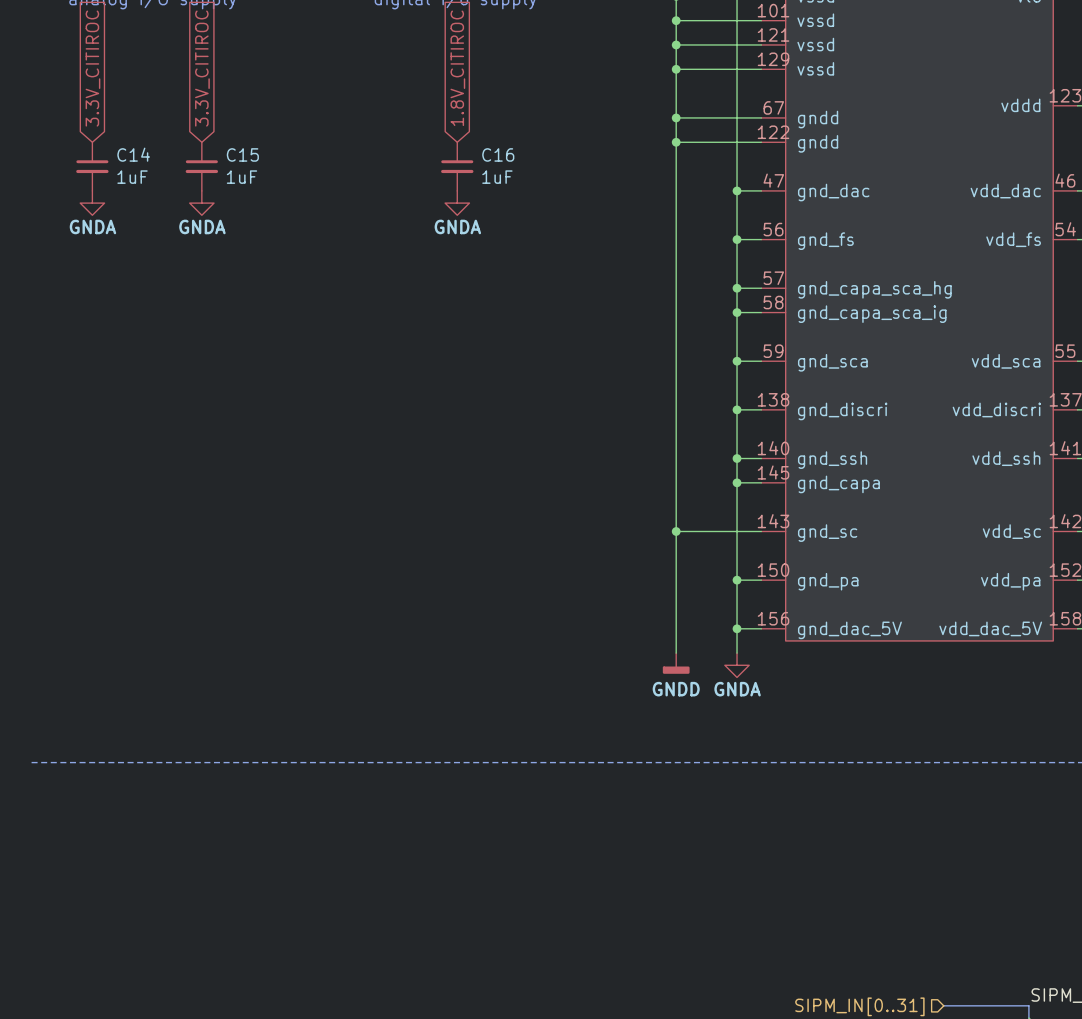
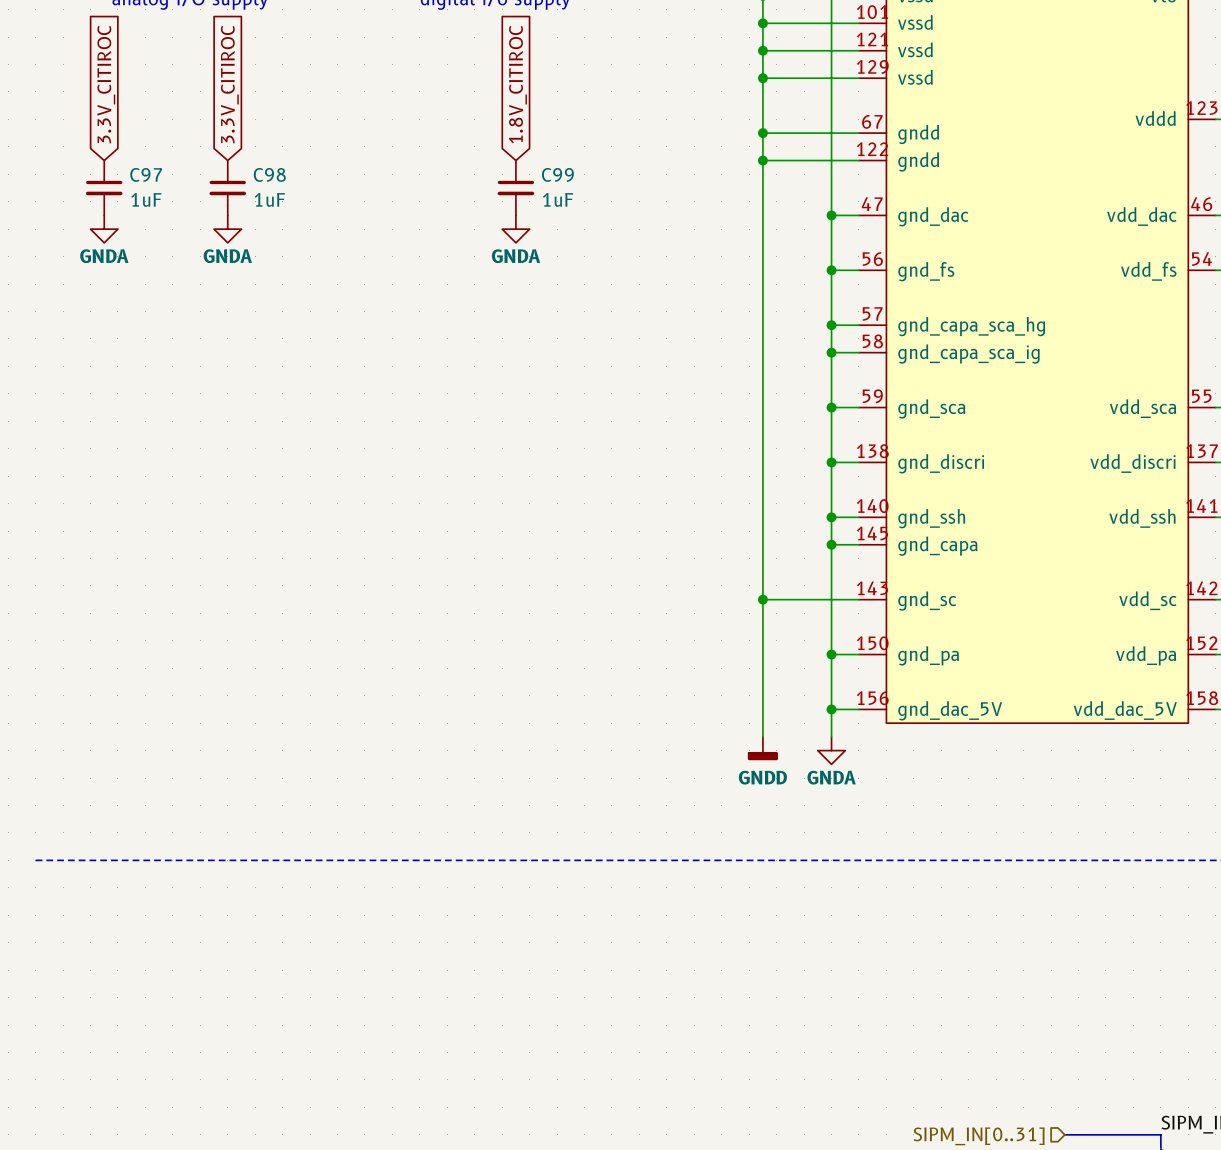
C14 name: C14 (133, 154) -> C97 (146, 174)
C15 name: C15 (242, 154) -> C98 (269, 174)
C16 name: C16 (498, 154) -> C99 (557, 174)

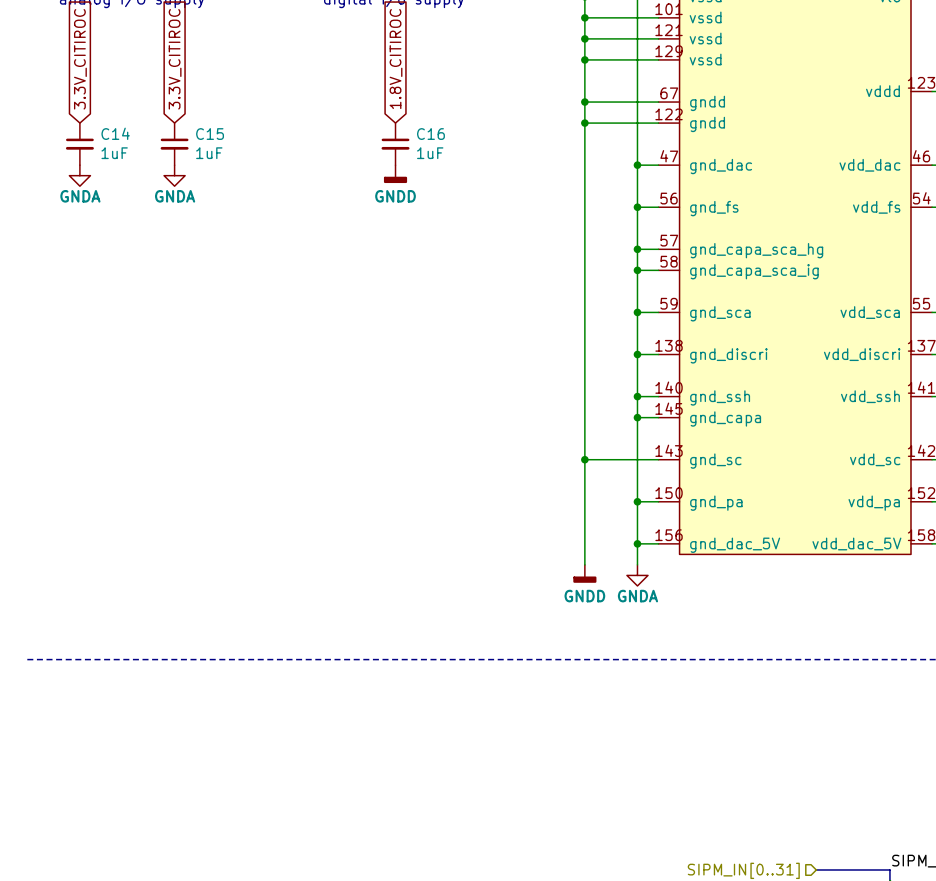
C97 name: C97 (146, 174) -> C14 (115, 133)
C98 name: C98 (269, 174) -> C15 (210, 134)
C99 name: C99 (557, 174) -> C16 (430, 134)
power symbol: GNDA (515, 229) -> GNDD (395, 174)

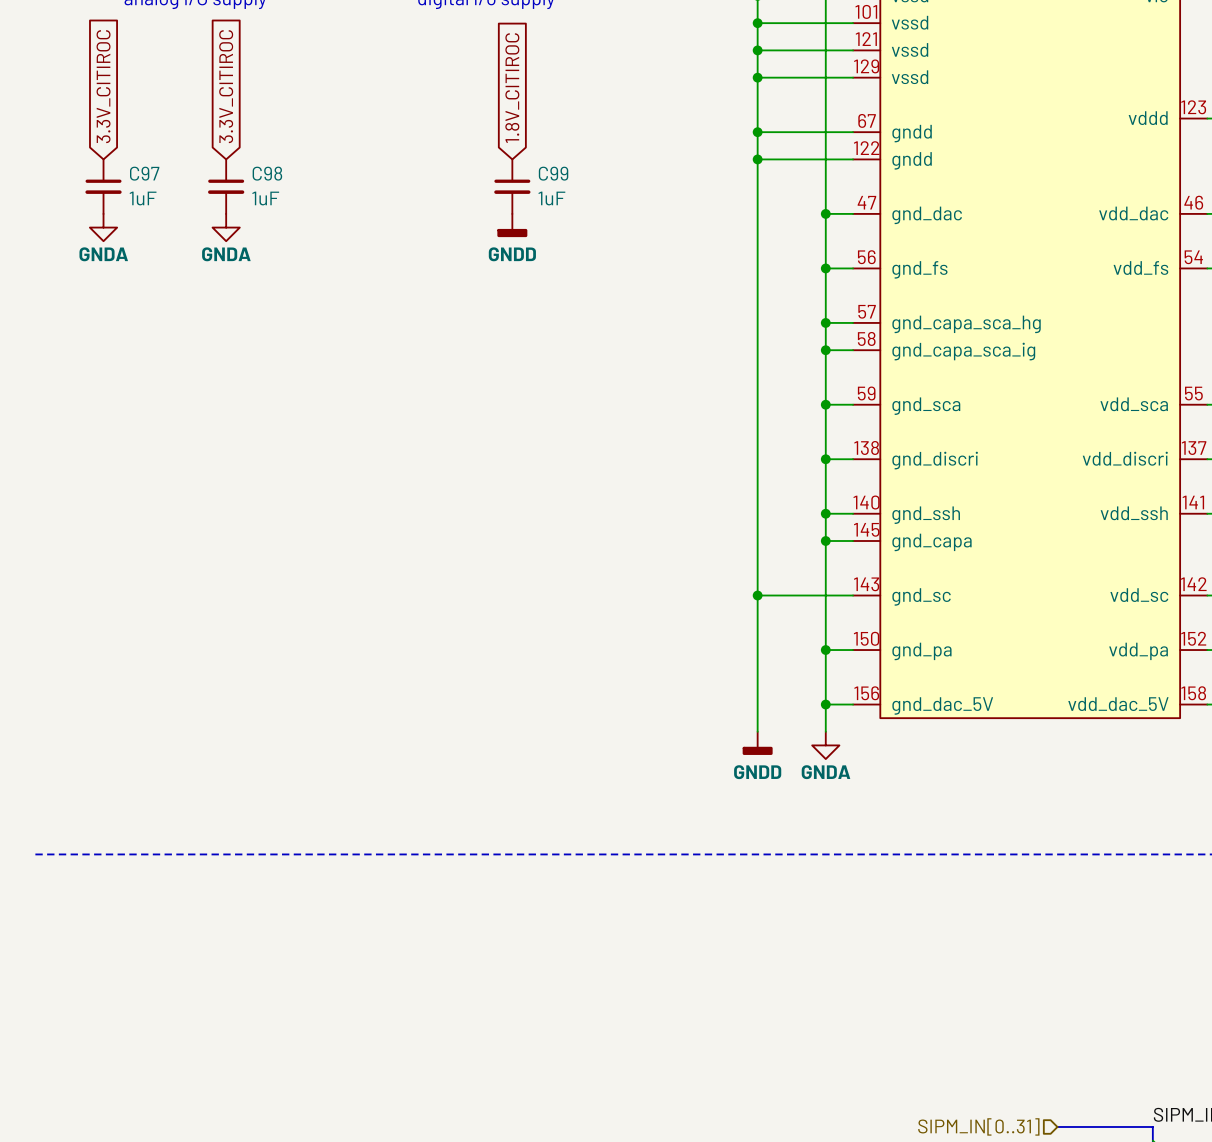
C14 name: C14 (115, 133) -> C97 (144, 173)
C15 name: C15 (210, 134) -> C98 (267, 173)
C16 name: C16 (430, 134) -> C99 (553, 173)

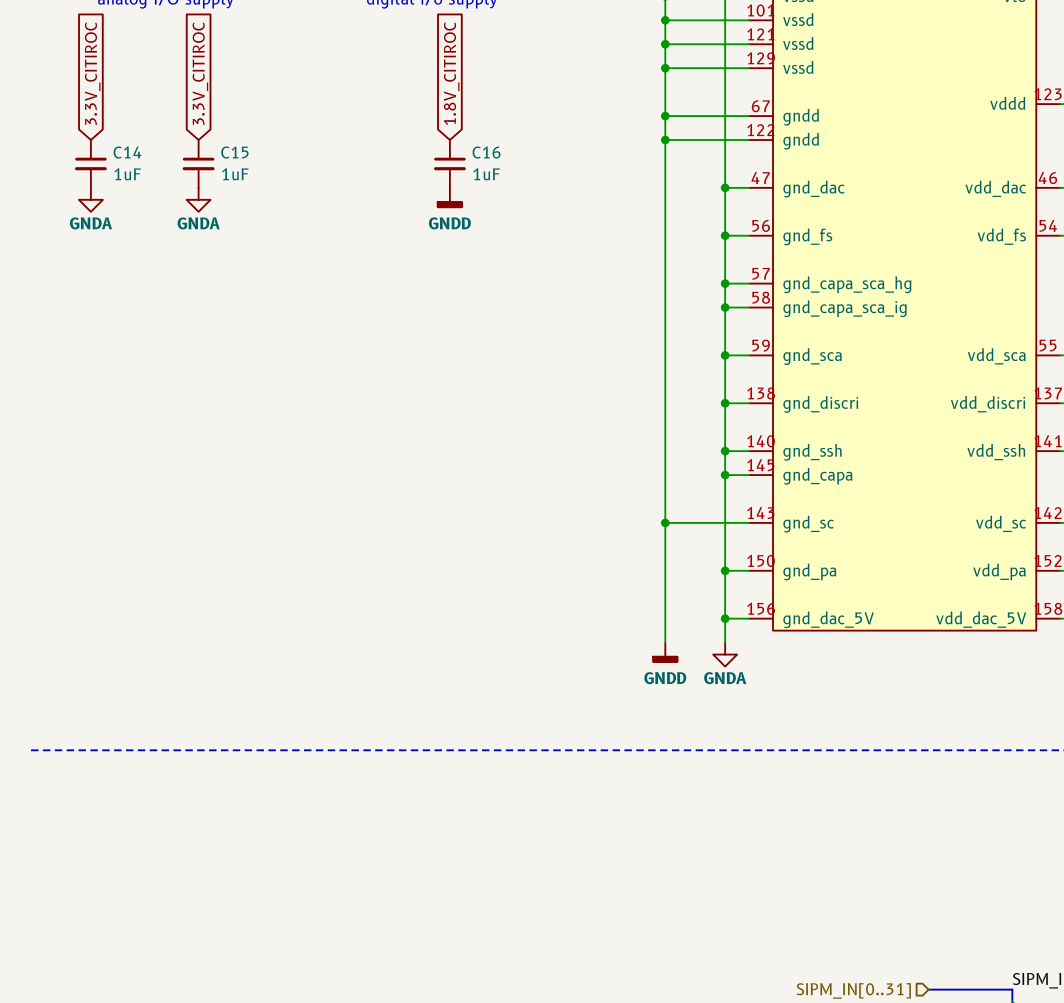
C97 name: C97 (144, 173) -> C14 (127, 152)
C98 name: C98 (267, 173) -> C15 (234, 152)
C99 name: C99 (553, 173) -> C16 (486, 152)

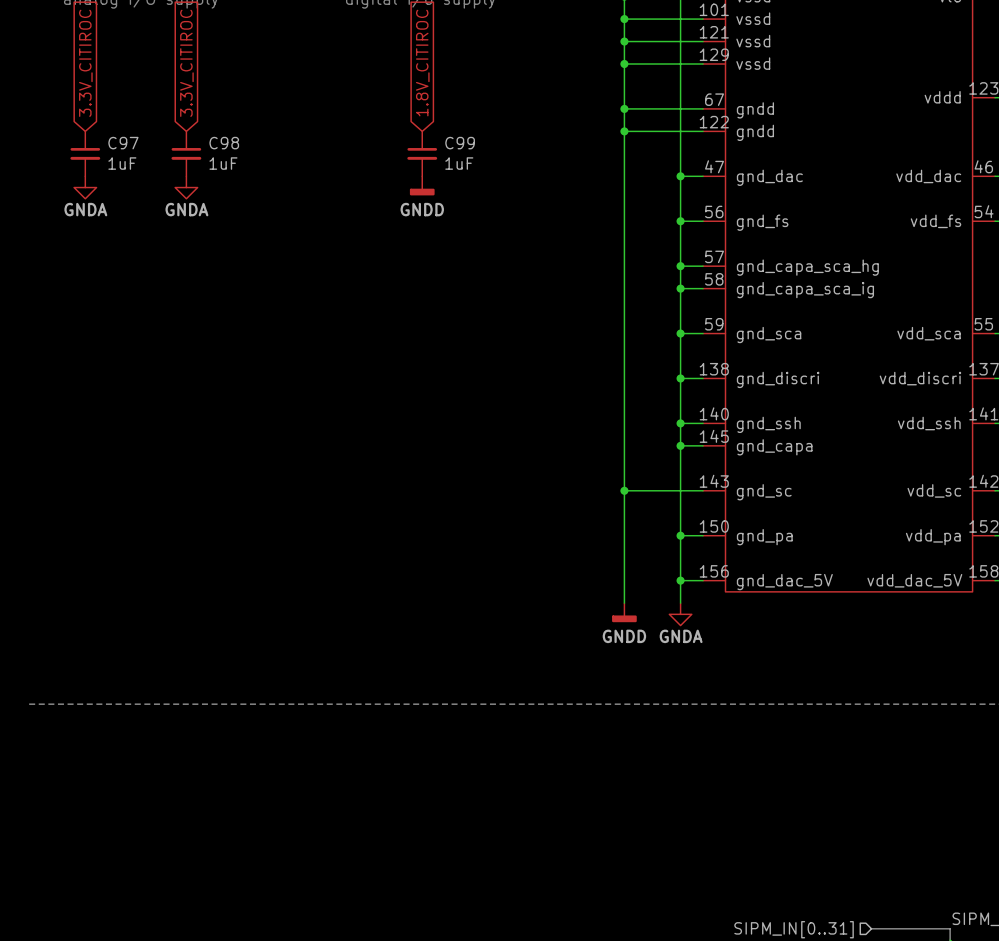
C14 name: C14 (127, 152) -> C97 (123, 143)
C15 name: C15 (234, 152) -> C98 (224, 143)
C16 name: C16 (486, 152) -> C99 (460, 143)

